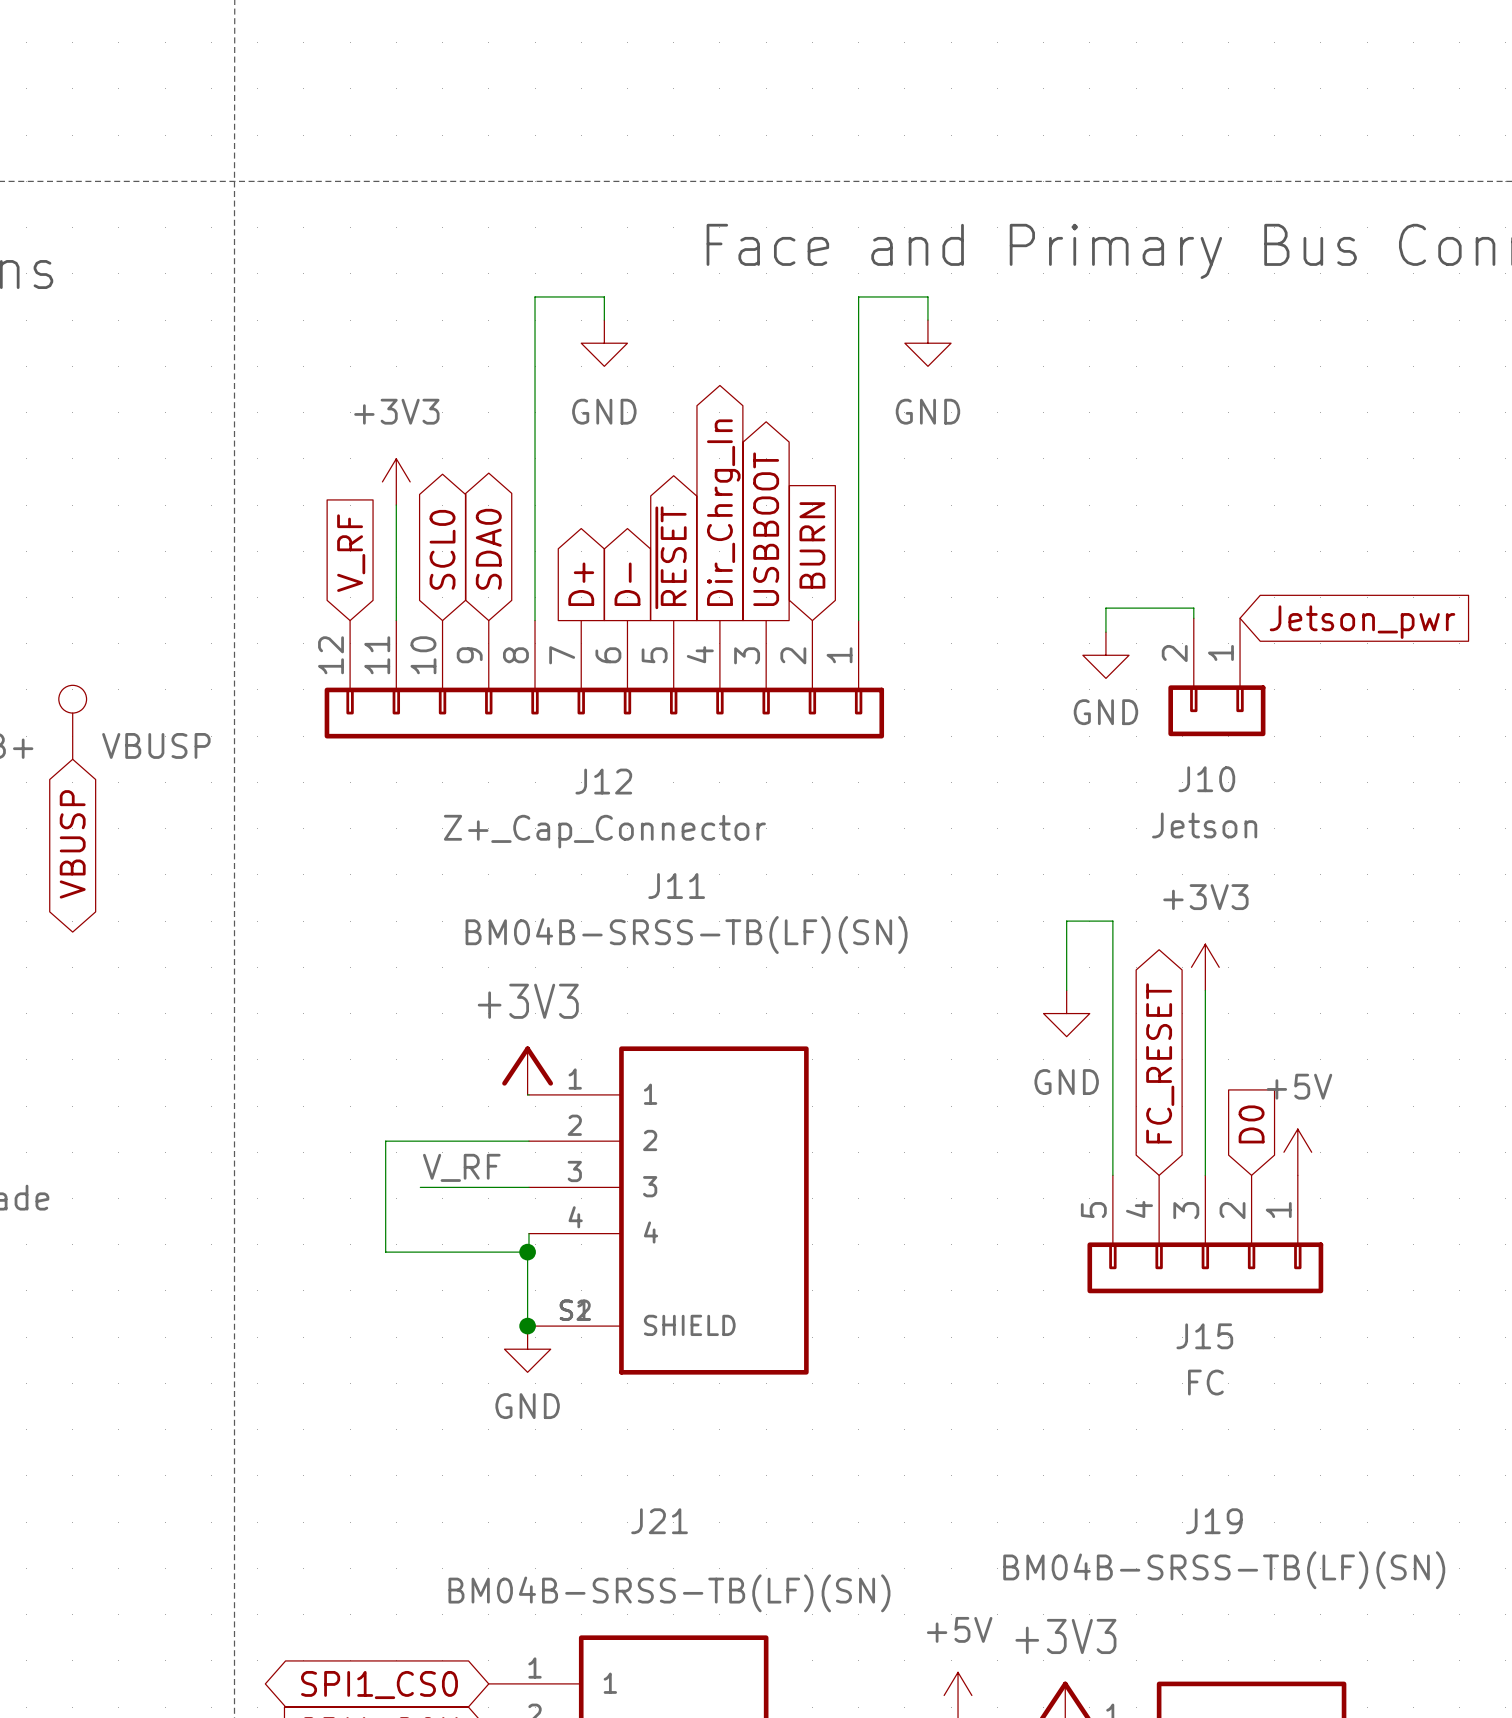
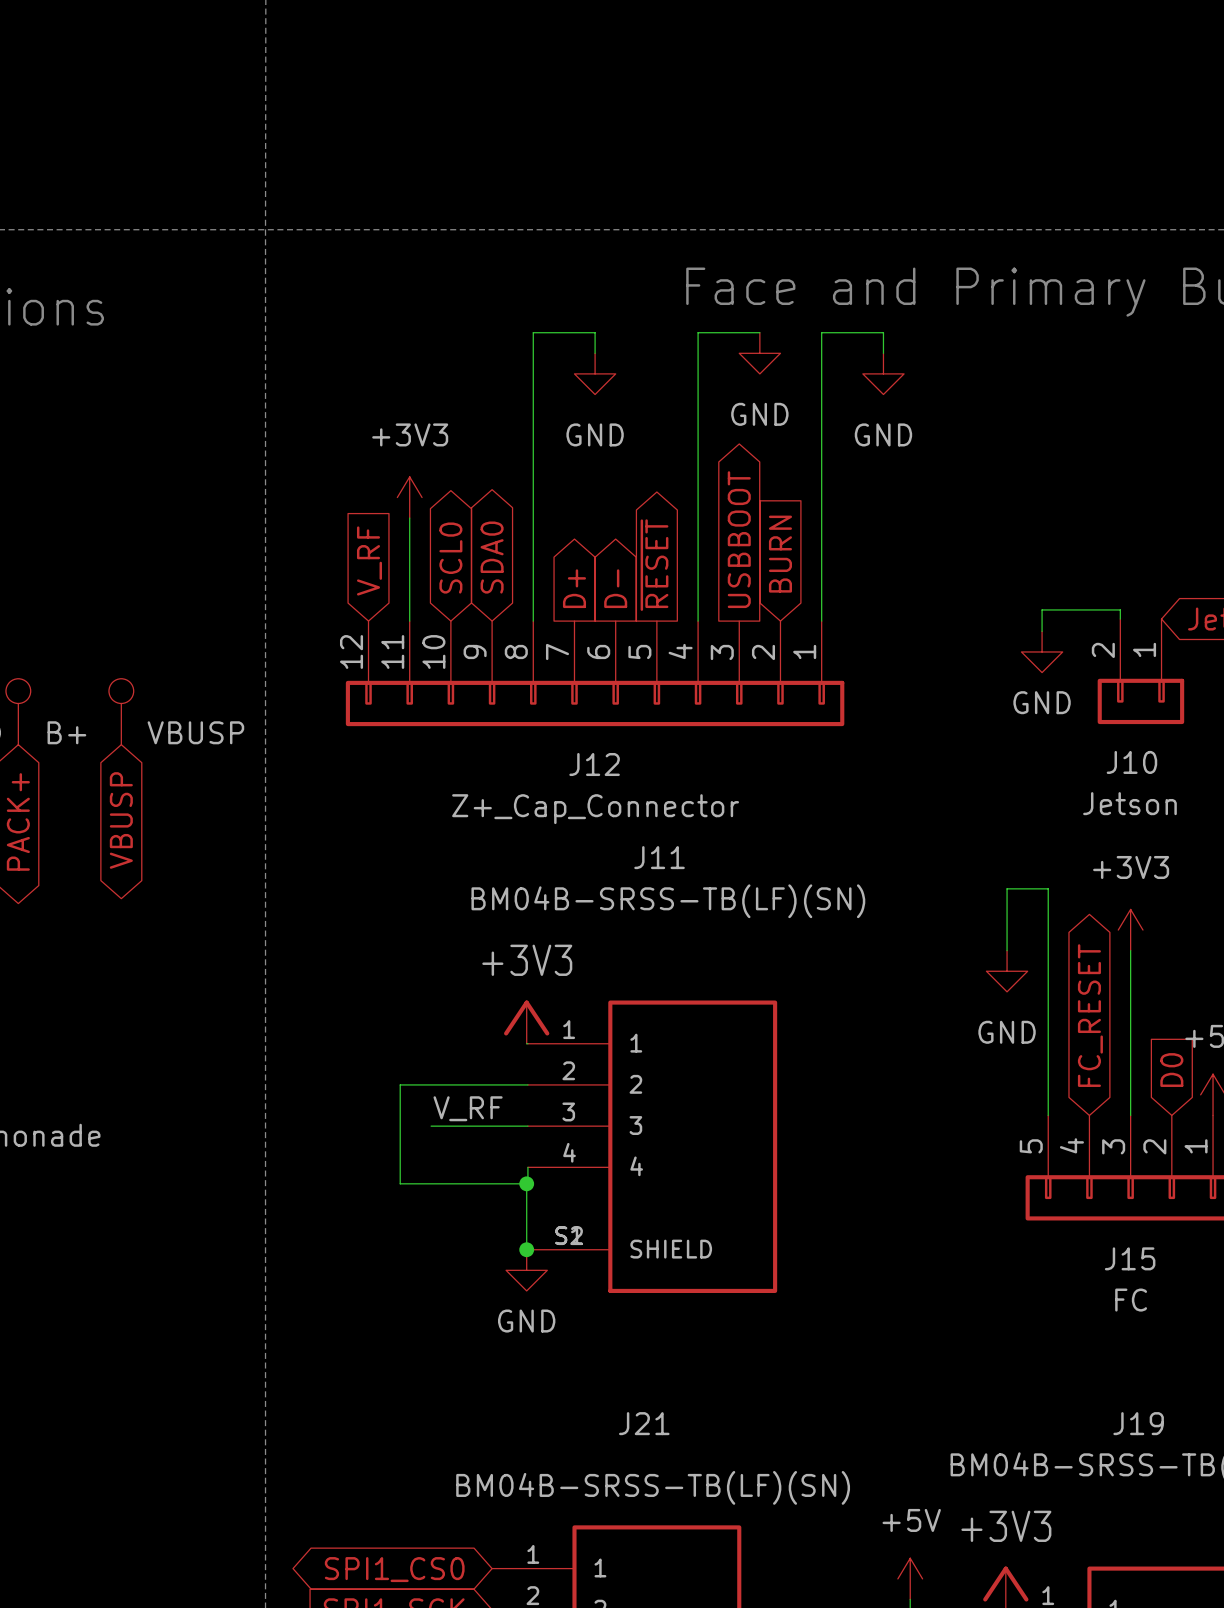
wire: none -> (759, 332) (698, 332) (698, 621)
power symbol: none -> GND (759, 353)
global label: Dir_Chrg_In (723, 512) -> none

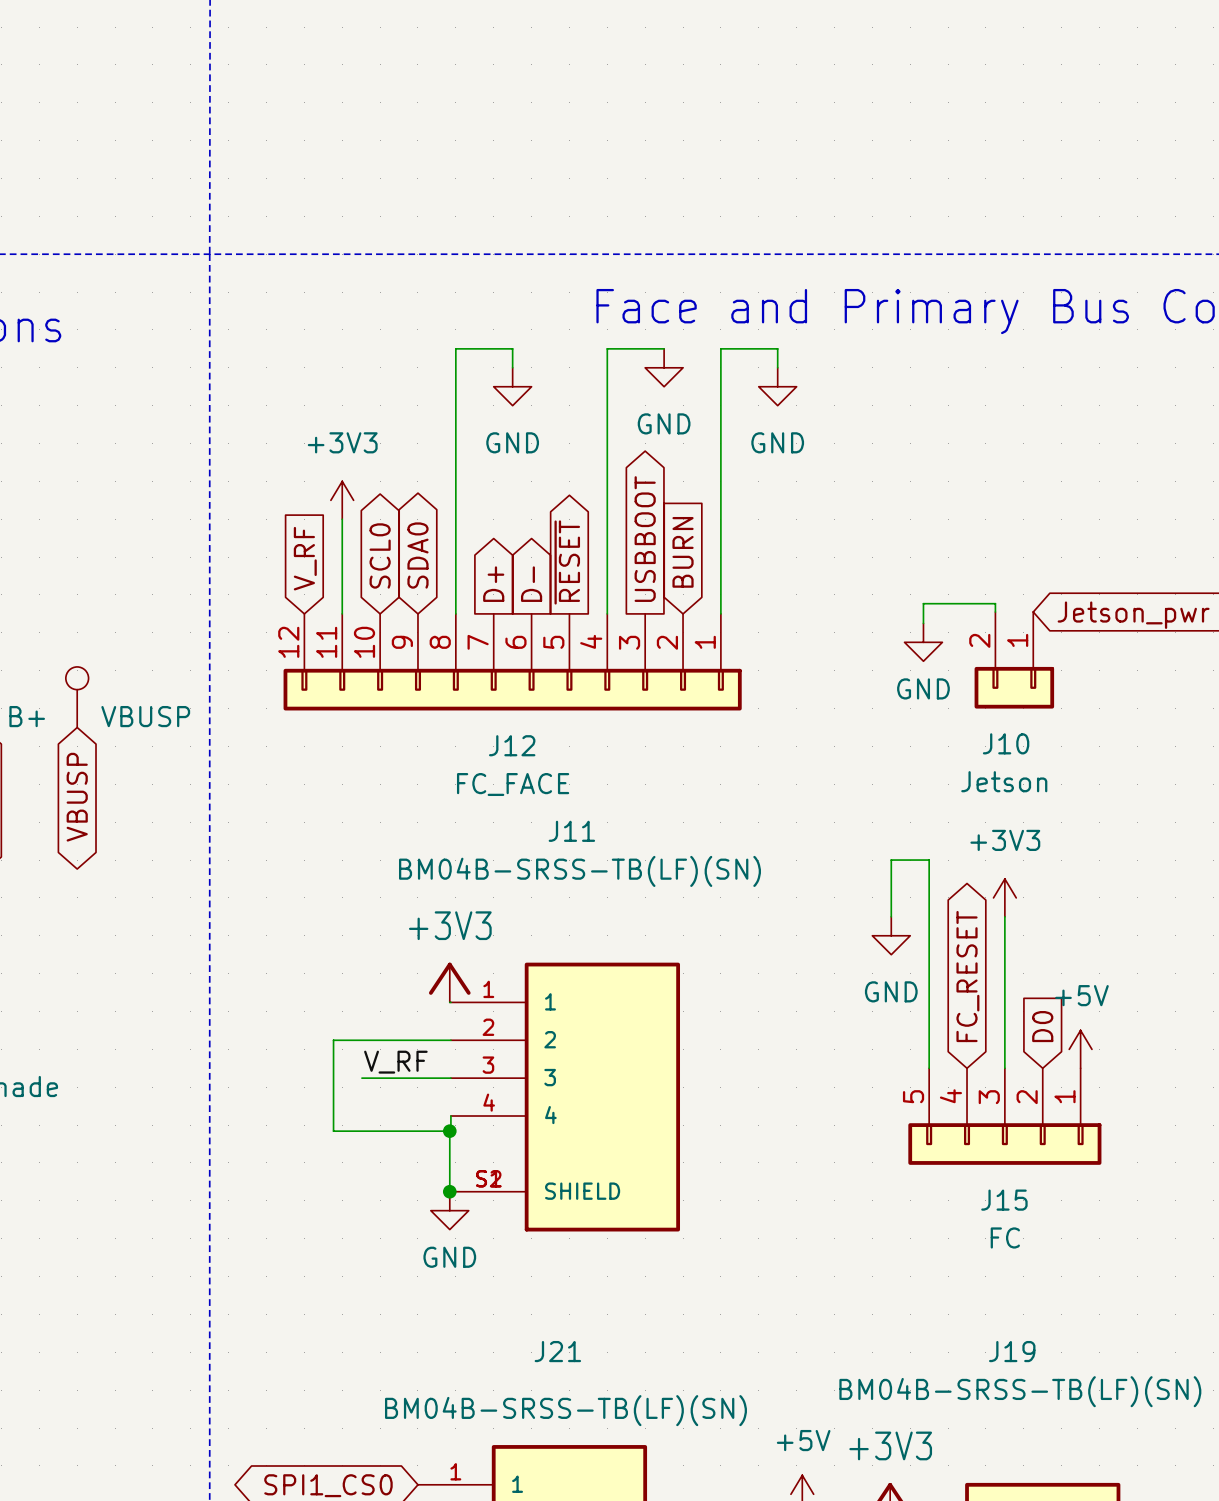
J12 value: Z+_Cap_Connector (595, 809) -> FC_FACE (513, 784)

